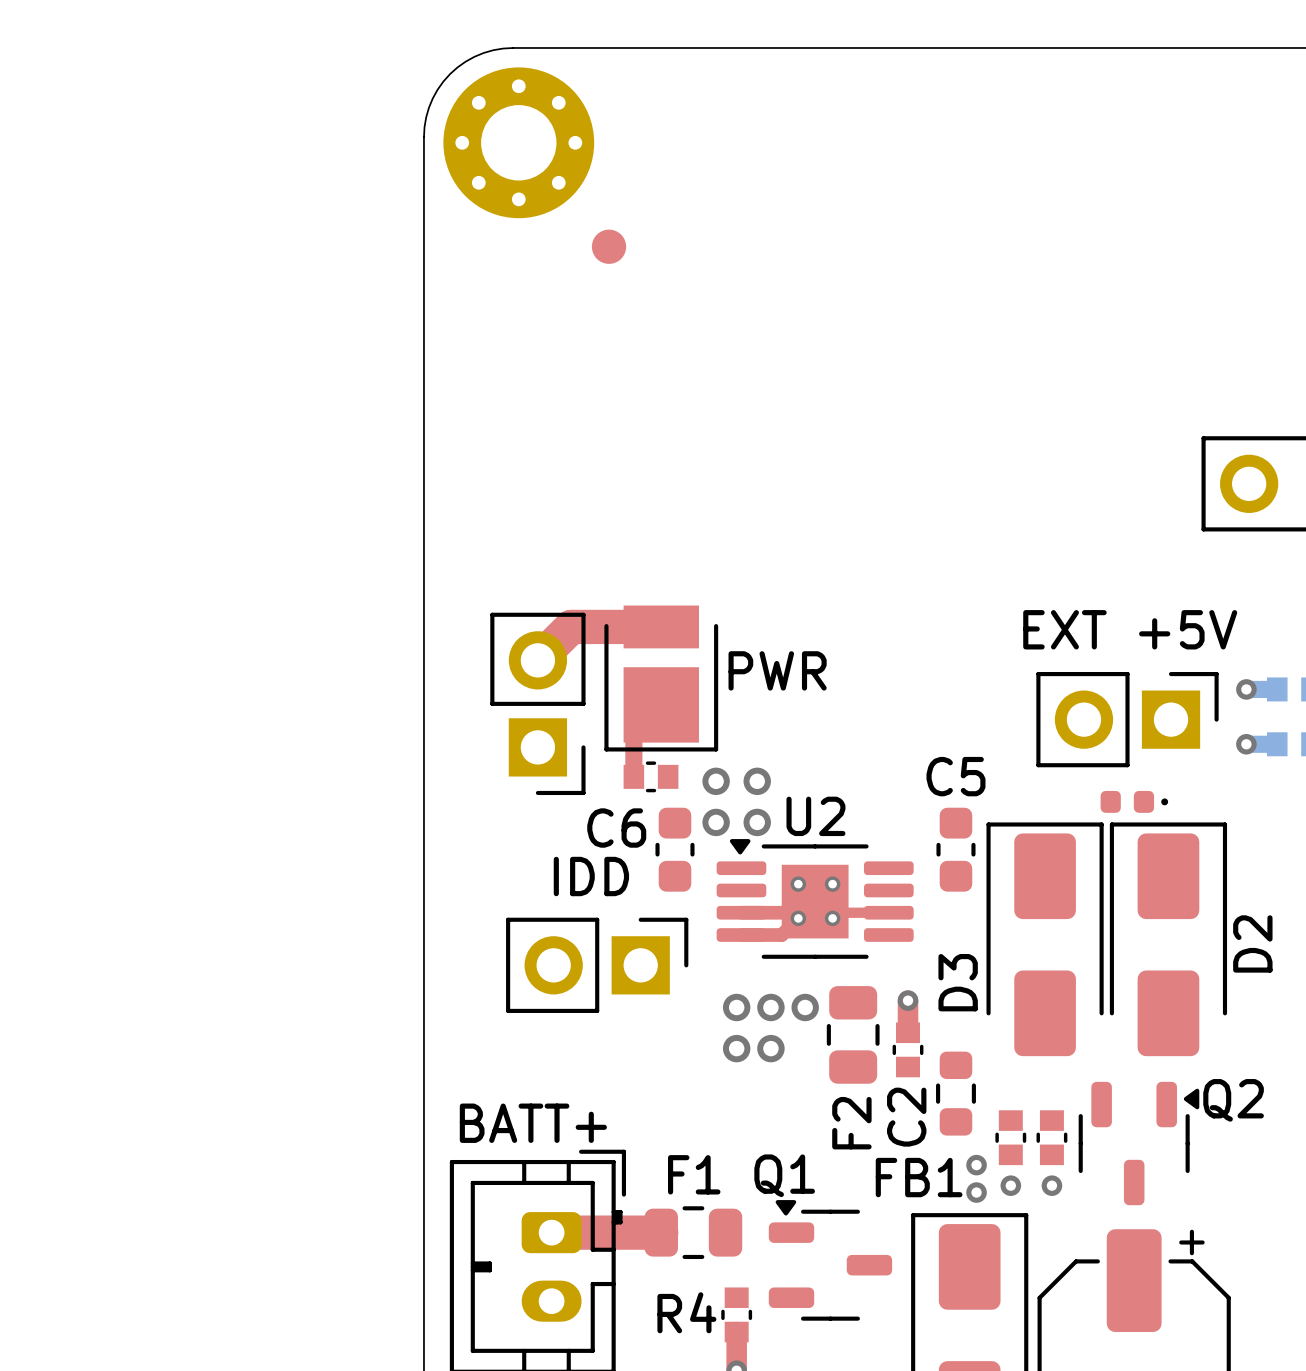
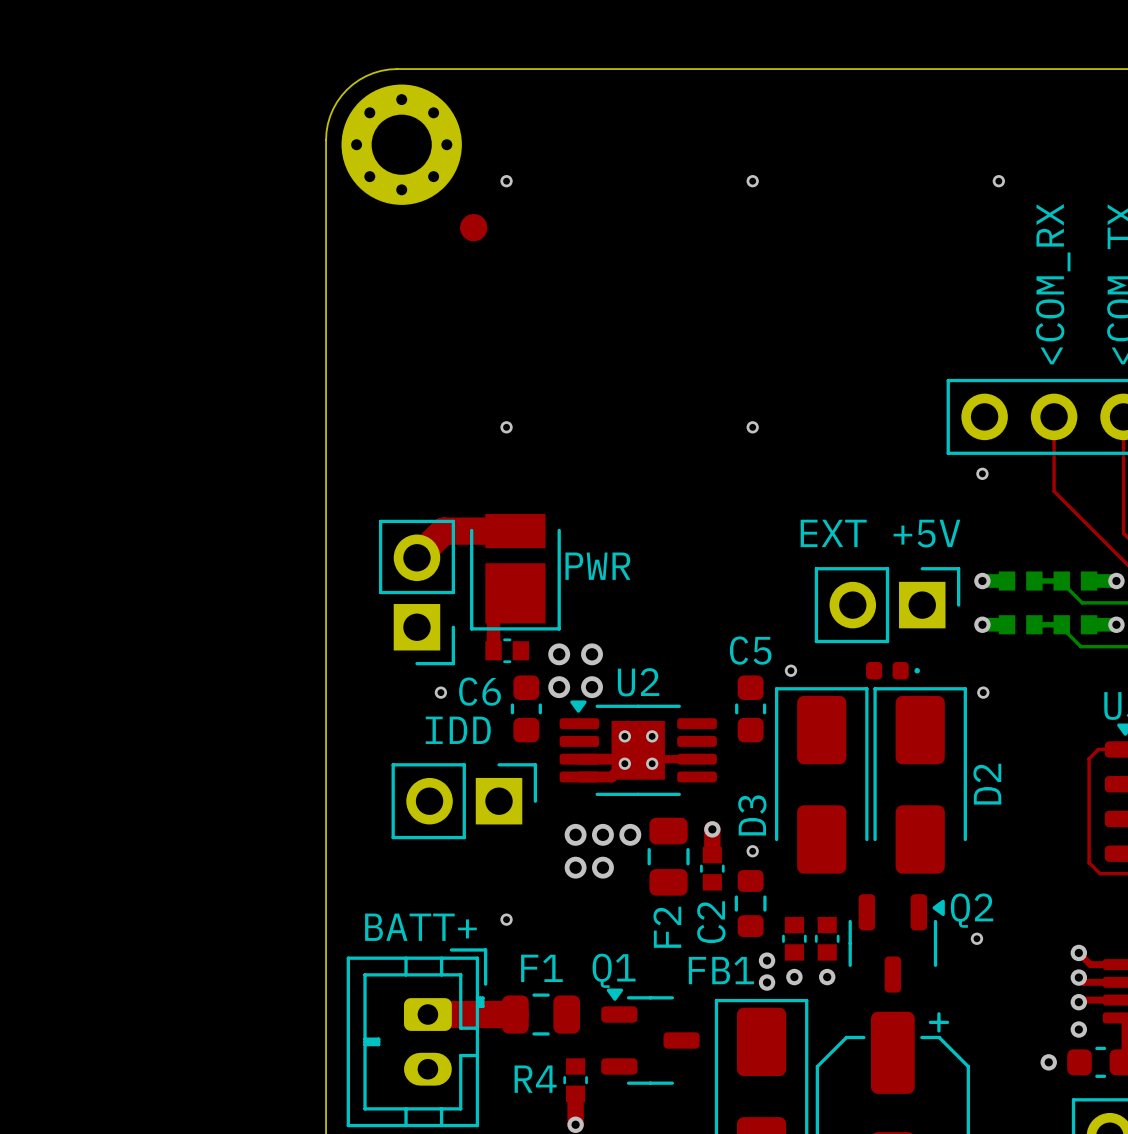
via: none -> (506, 181)
via: none -> (752, 181)
via: none -> (998, 181)
via: none -> (506, 427)
via: none -> (752, 427)
via: none -> (982, 473)
via: none -> (790, 670)
via: none -> (440, 692)
via: none -> (983, 692)
via: none -> (752, 851)
via: none -> (506, 919)
via: none -> (976, 938)

